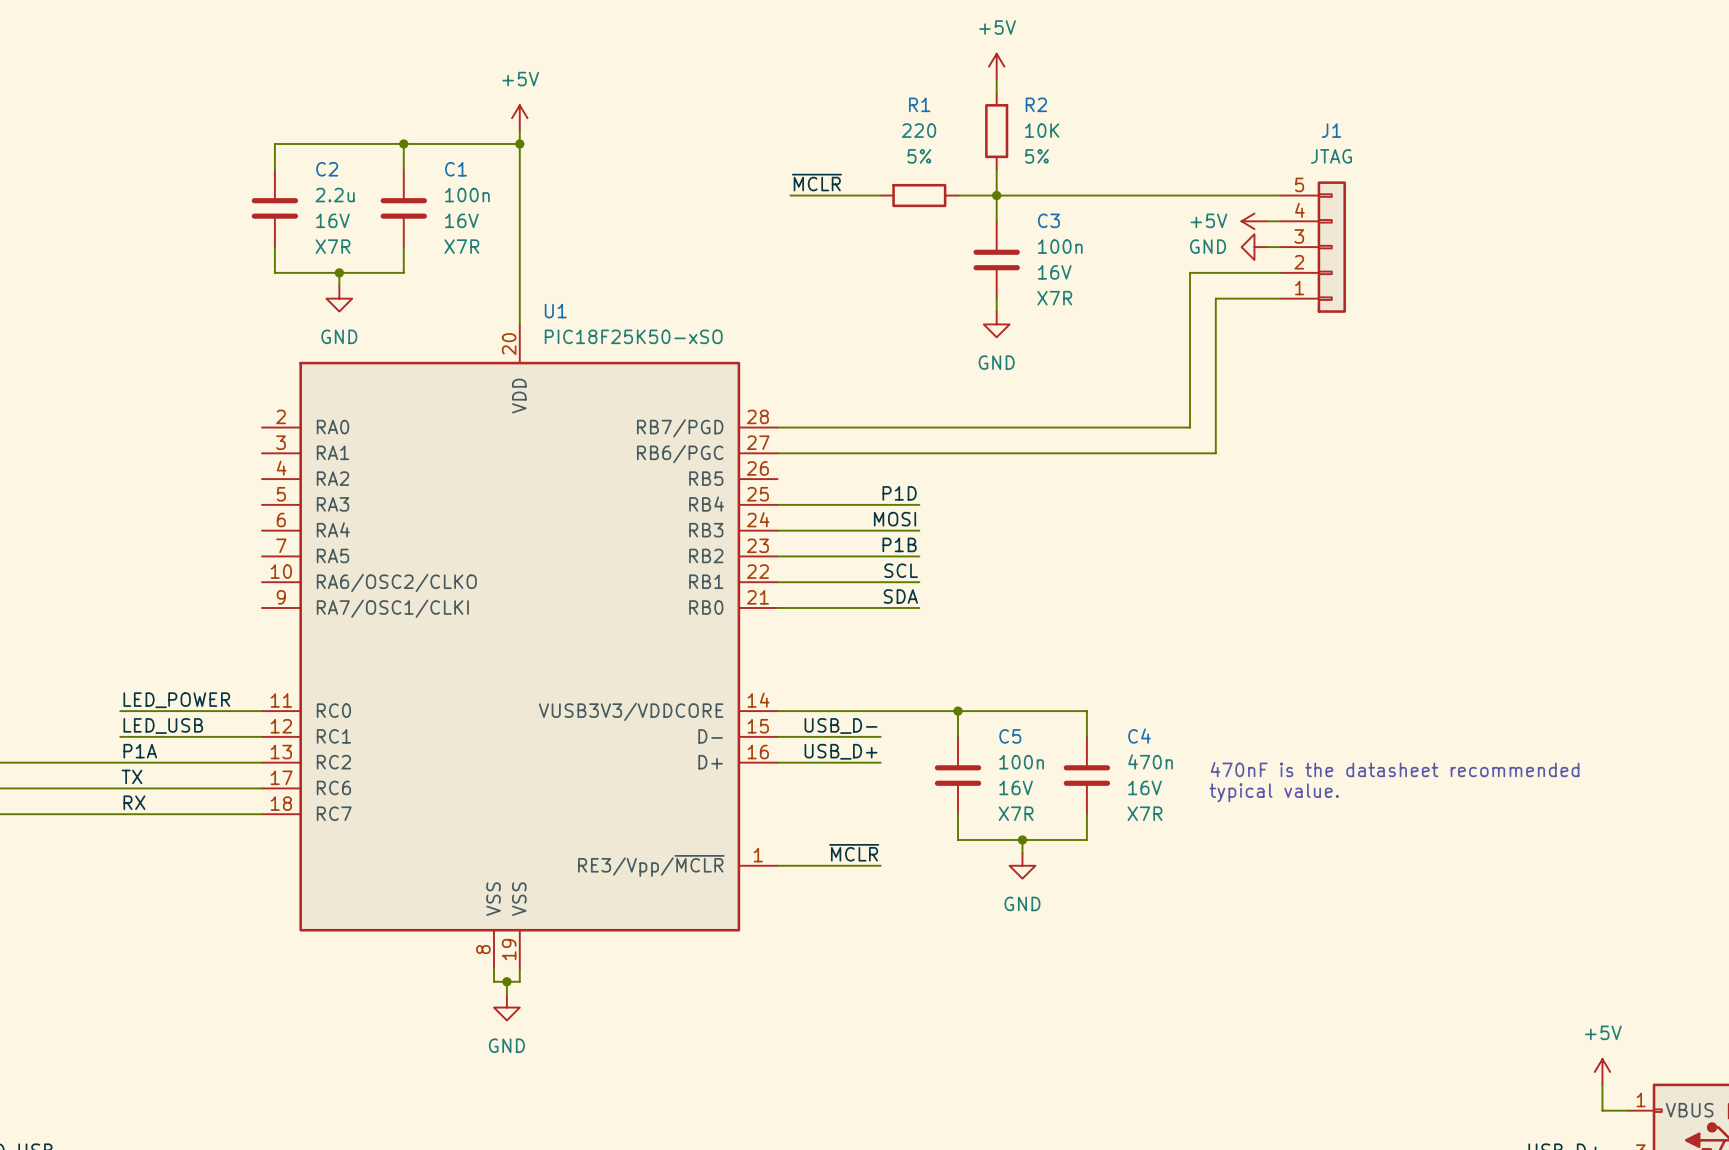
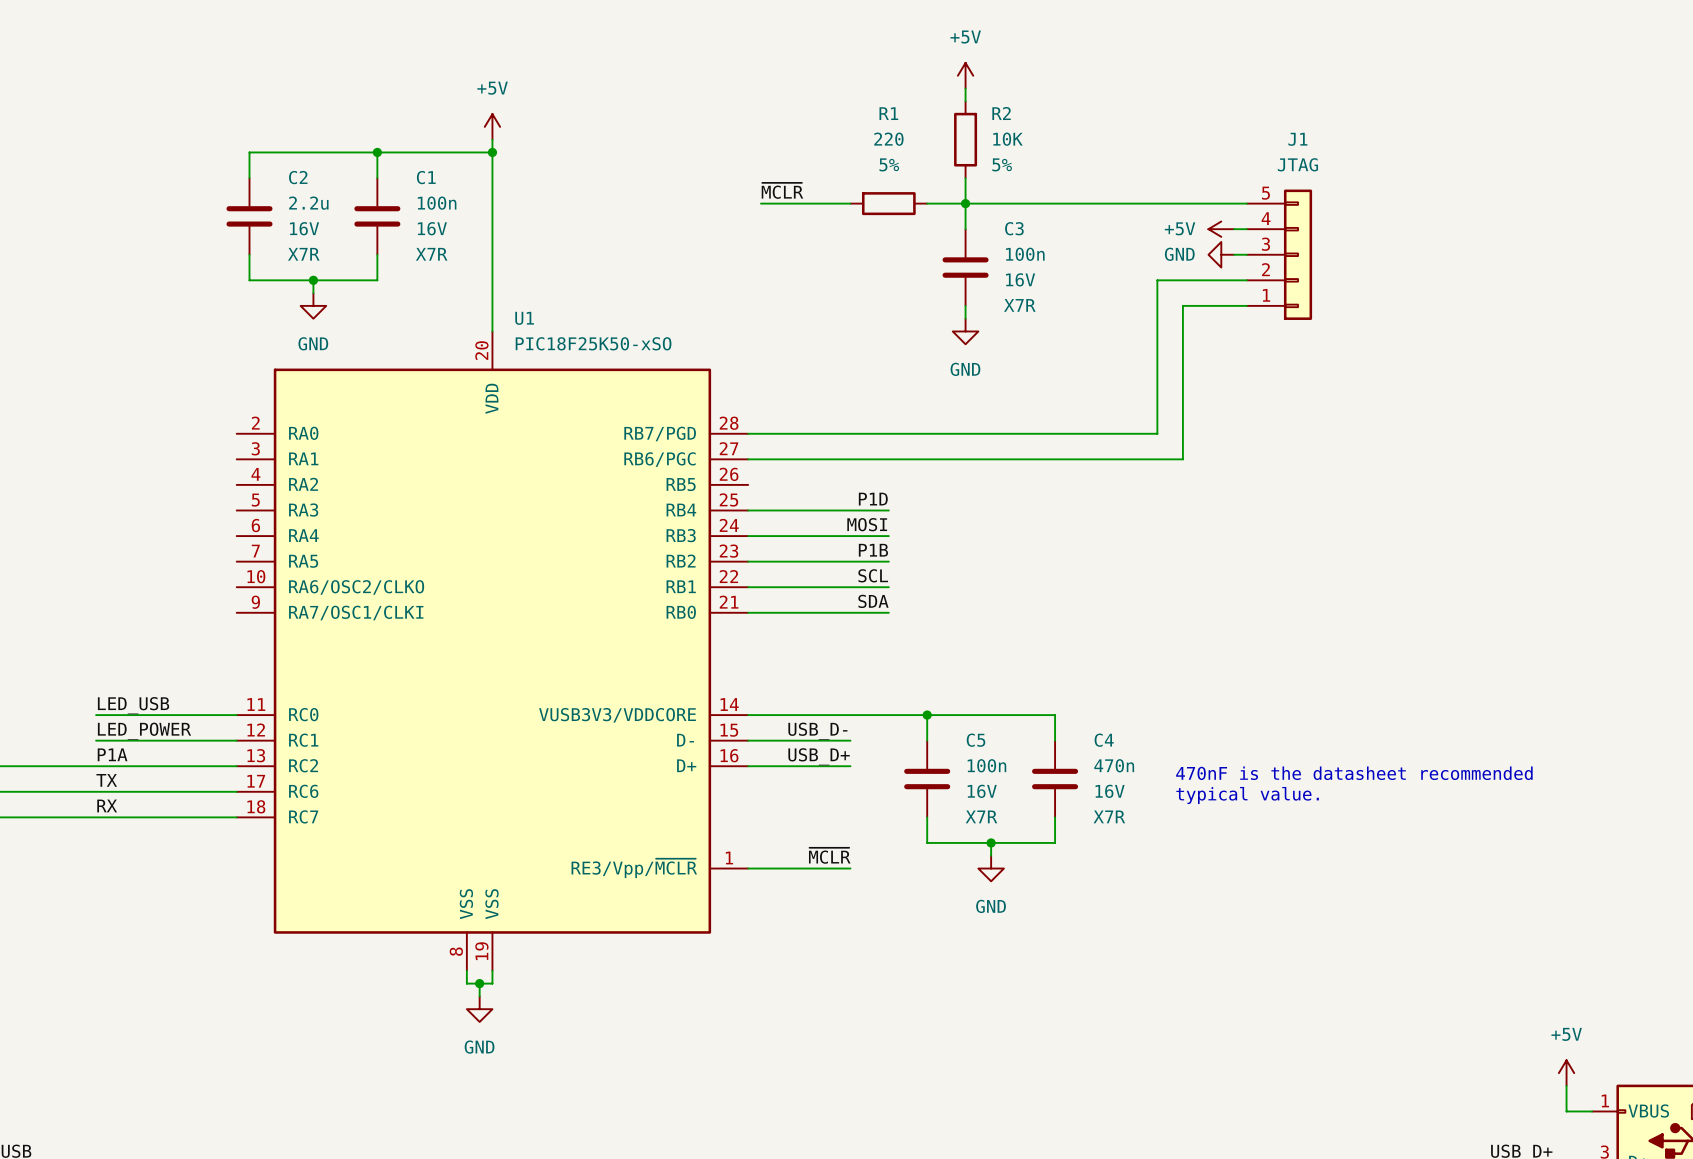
label: LED_POWER (176, 700) -> LED_USB (133, 705)
label: LED_USB (163, 725) -> LED_POWER (144, 731)

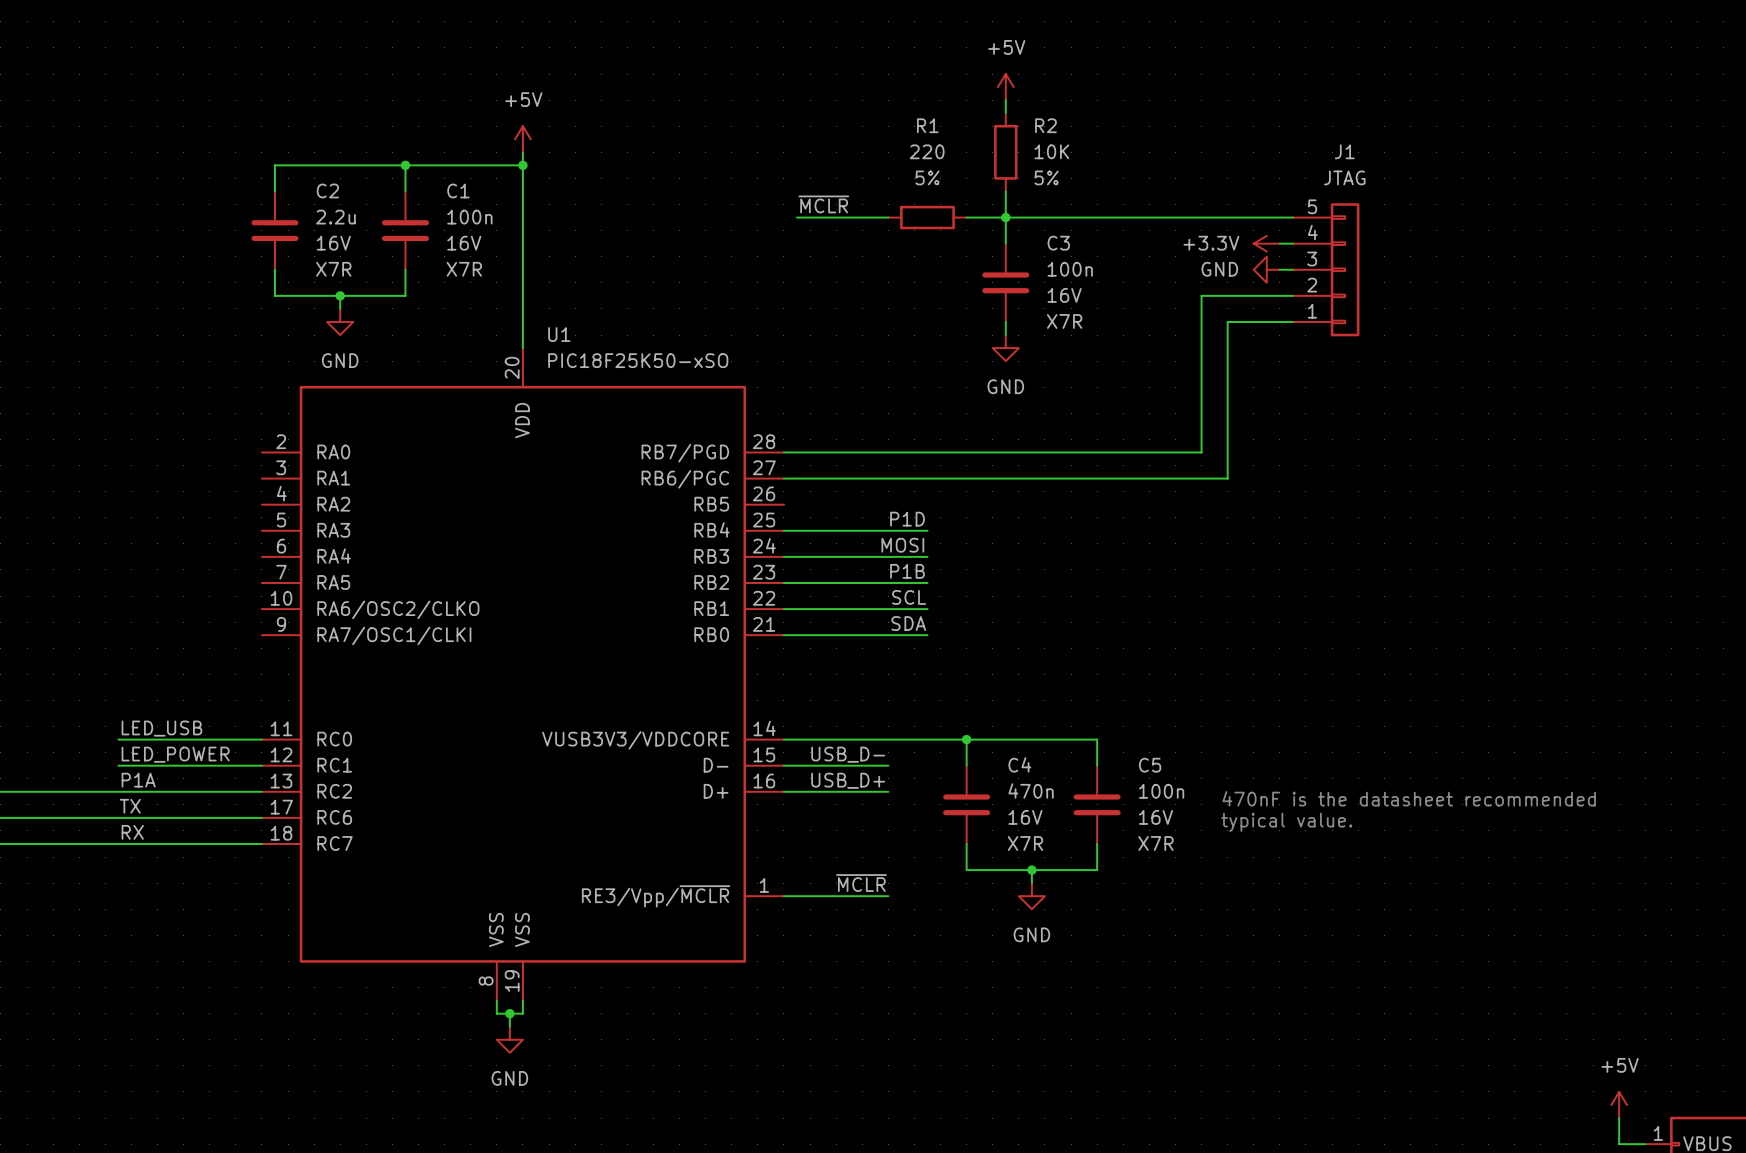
power symbol: +5V (1221, 229) -> +3.3V (1266, 243)
C5 name: C5 (976, 740) -> C4 (1019, 764)
C4 name: C4 (1104, 740) -> C5 (1150, 765)
C5 value: 100n (986, 765) -> 470n (1031, 790)
C4 value: 470n (1114, 765) -> 100n (1161, 791)

